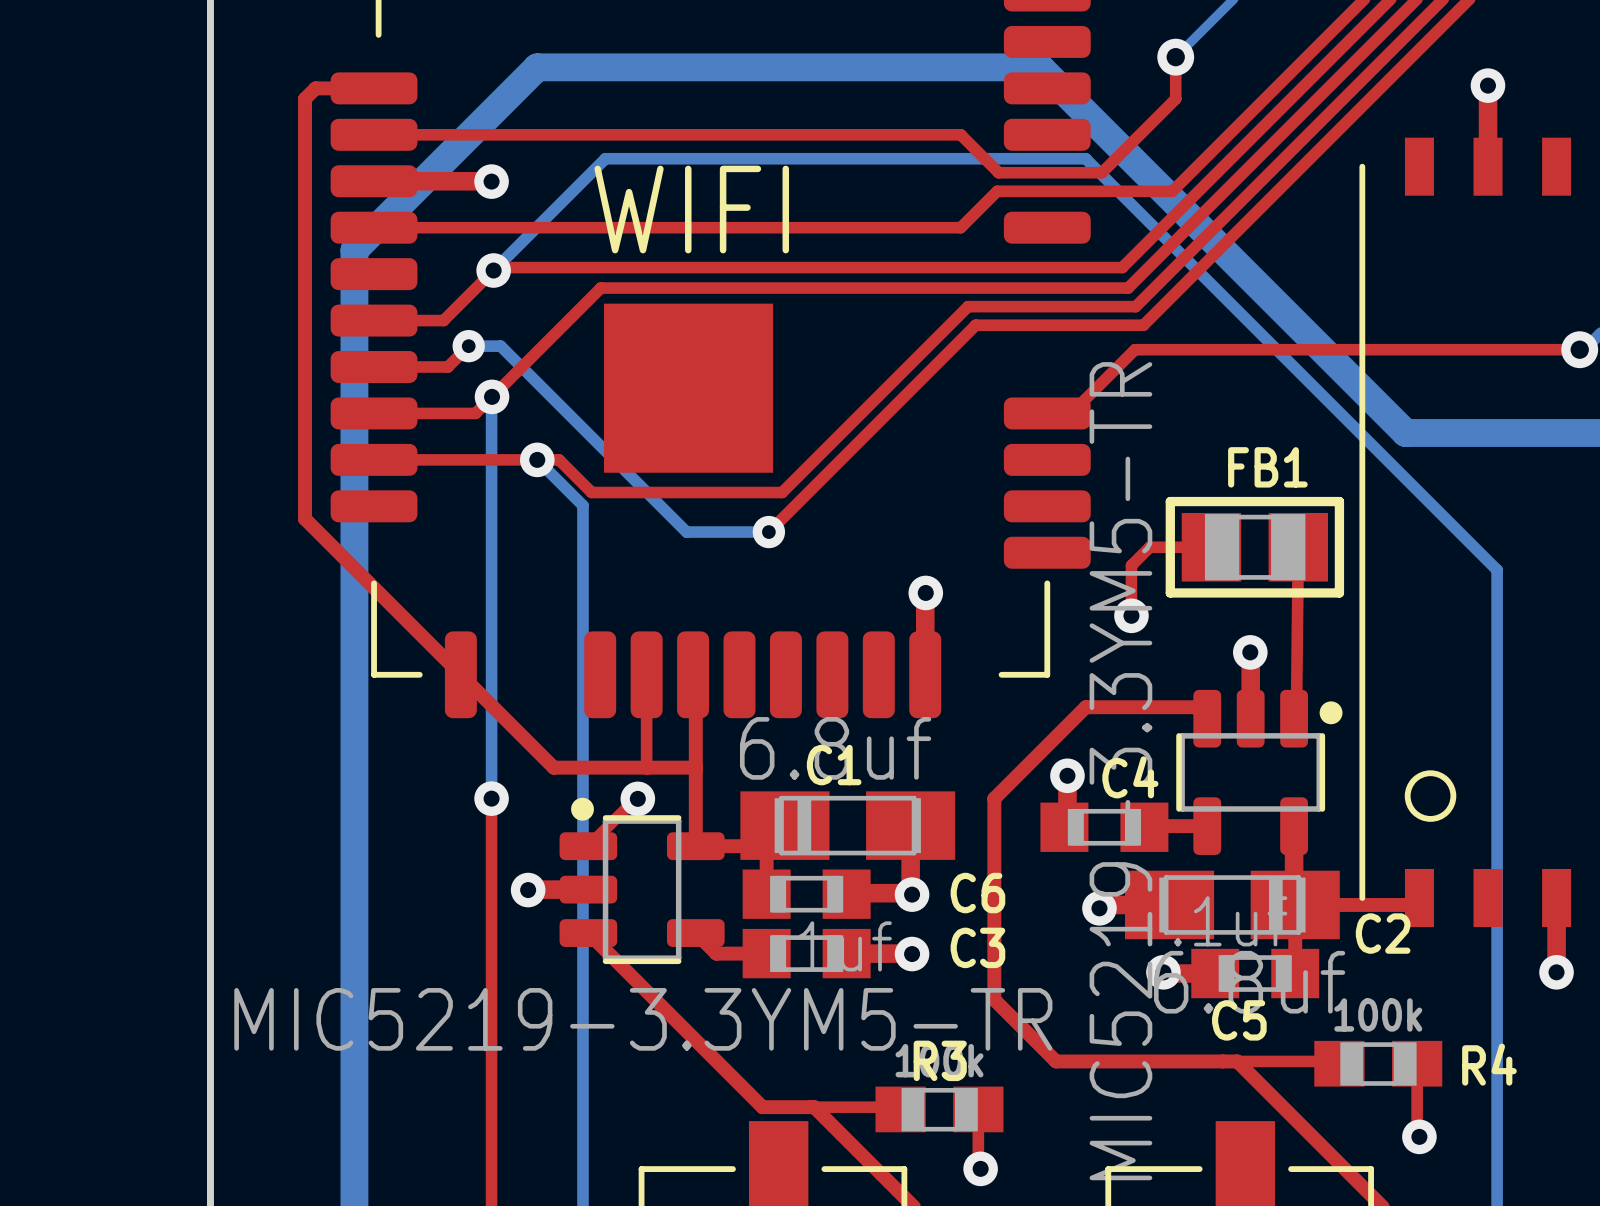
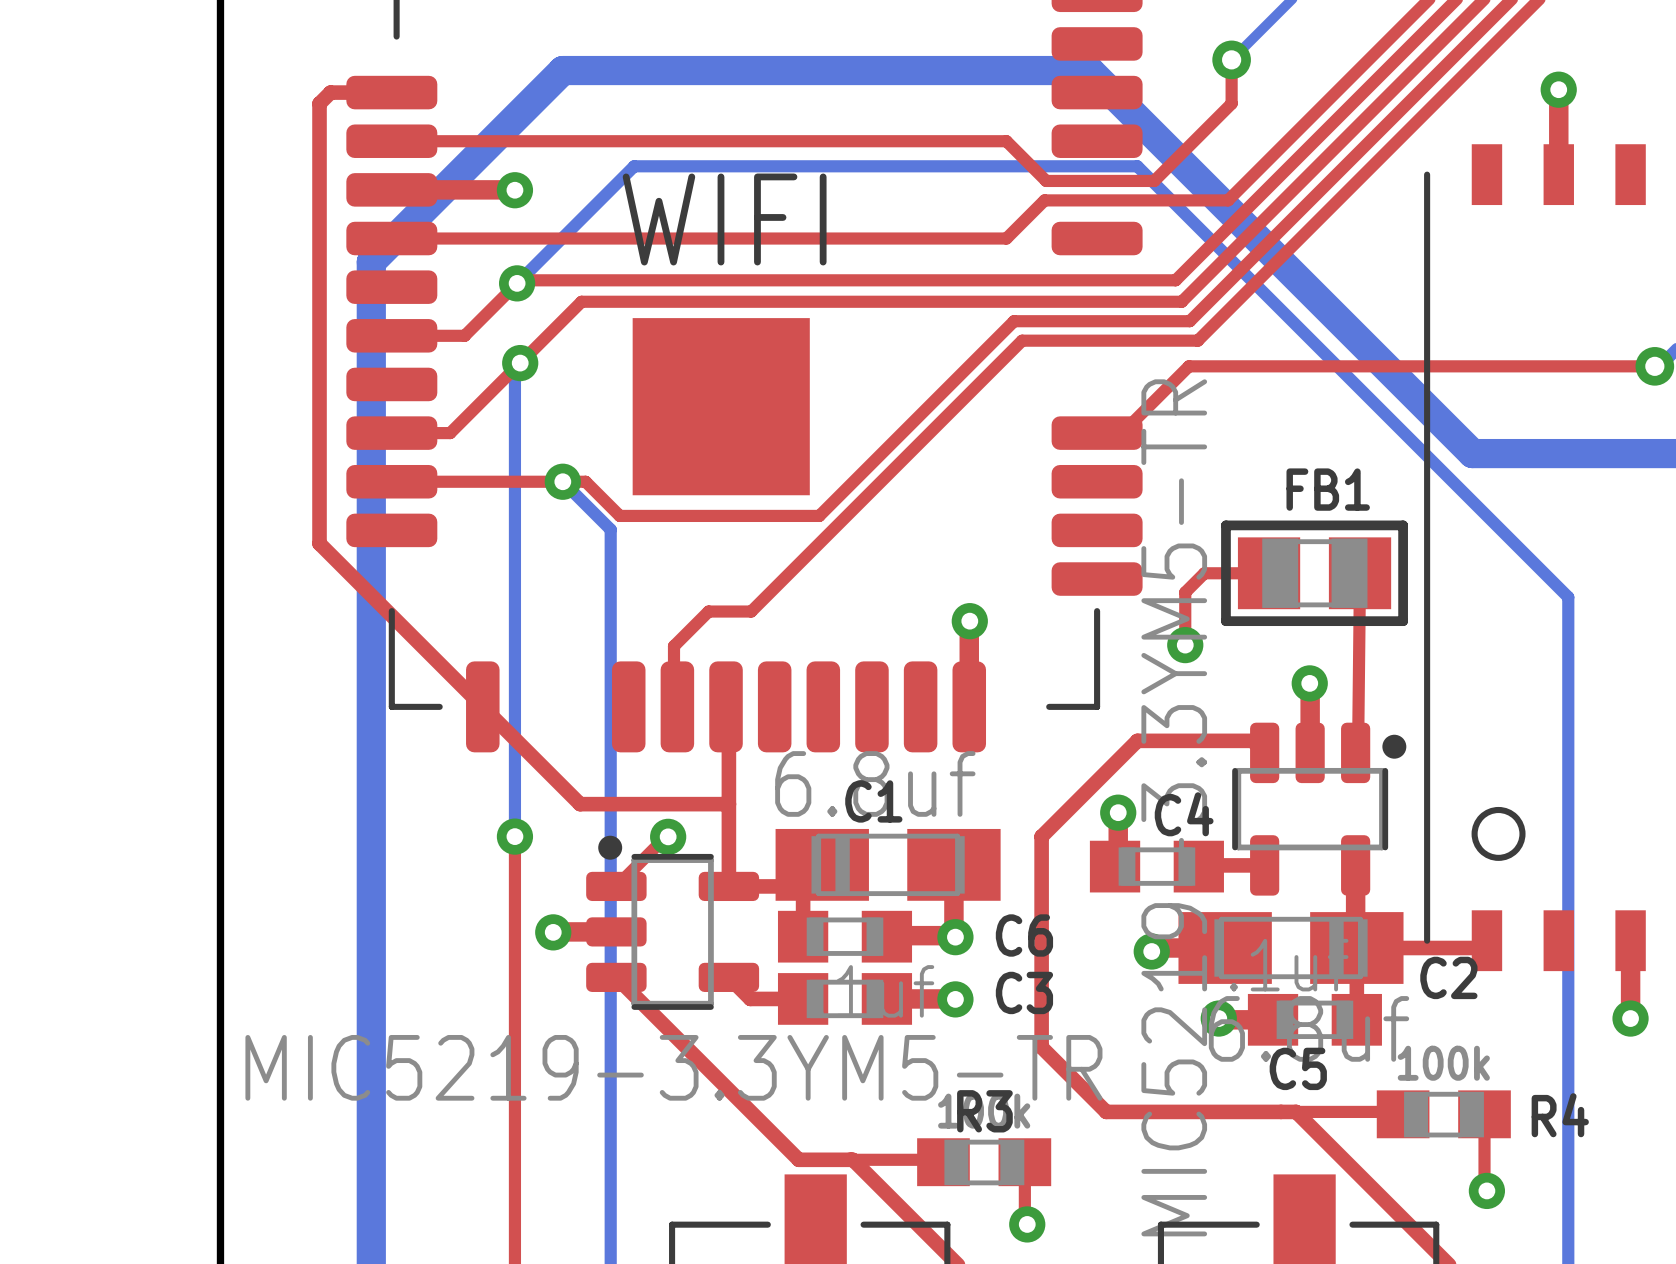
top track: (600, 288) (475, 413) (429, 413) -> (629, 301) (581, 301) (450, 433)
bottom track: (468, 346) (500, 346) (686, 532) (768, 532) -> none
top track: (468, 346) (447, 367) (374, 367) -> none
via: (468, 346) -> none
bottom track: none -> (520, 363) (514, 368) (514, 416)
via position: (492, 396) -> (520, 363)
via: (768, 532) -> none
top track: (646, 674) (646, 767) -> (677, 706) (674, 703) (674, 646) (708, 611) (751, 611) (805, 557)

